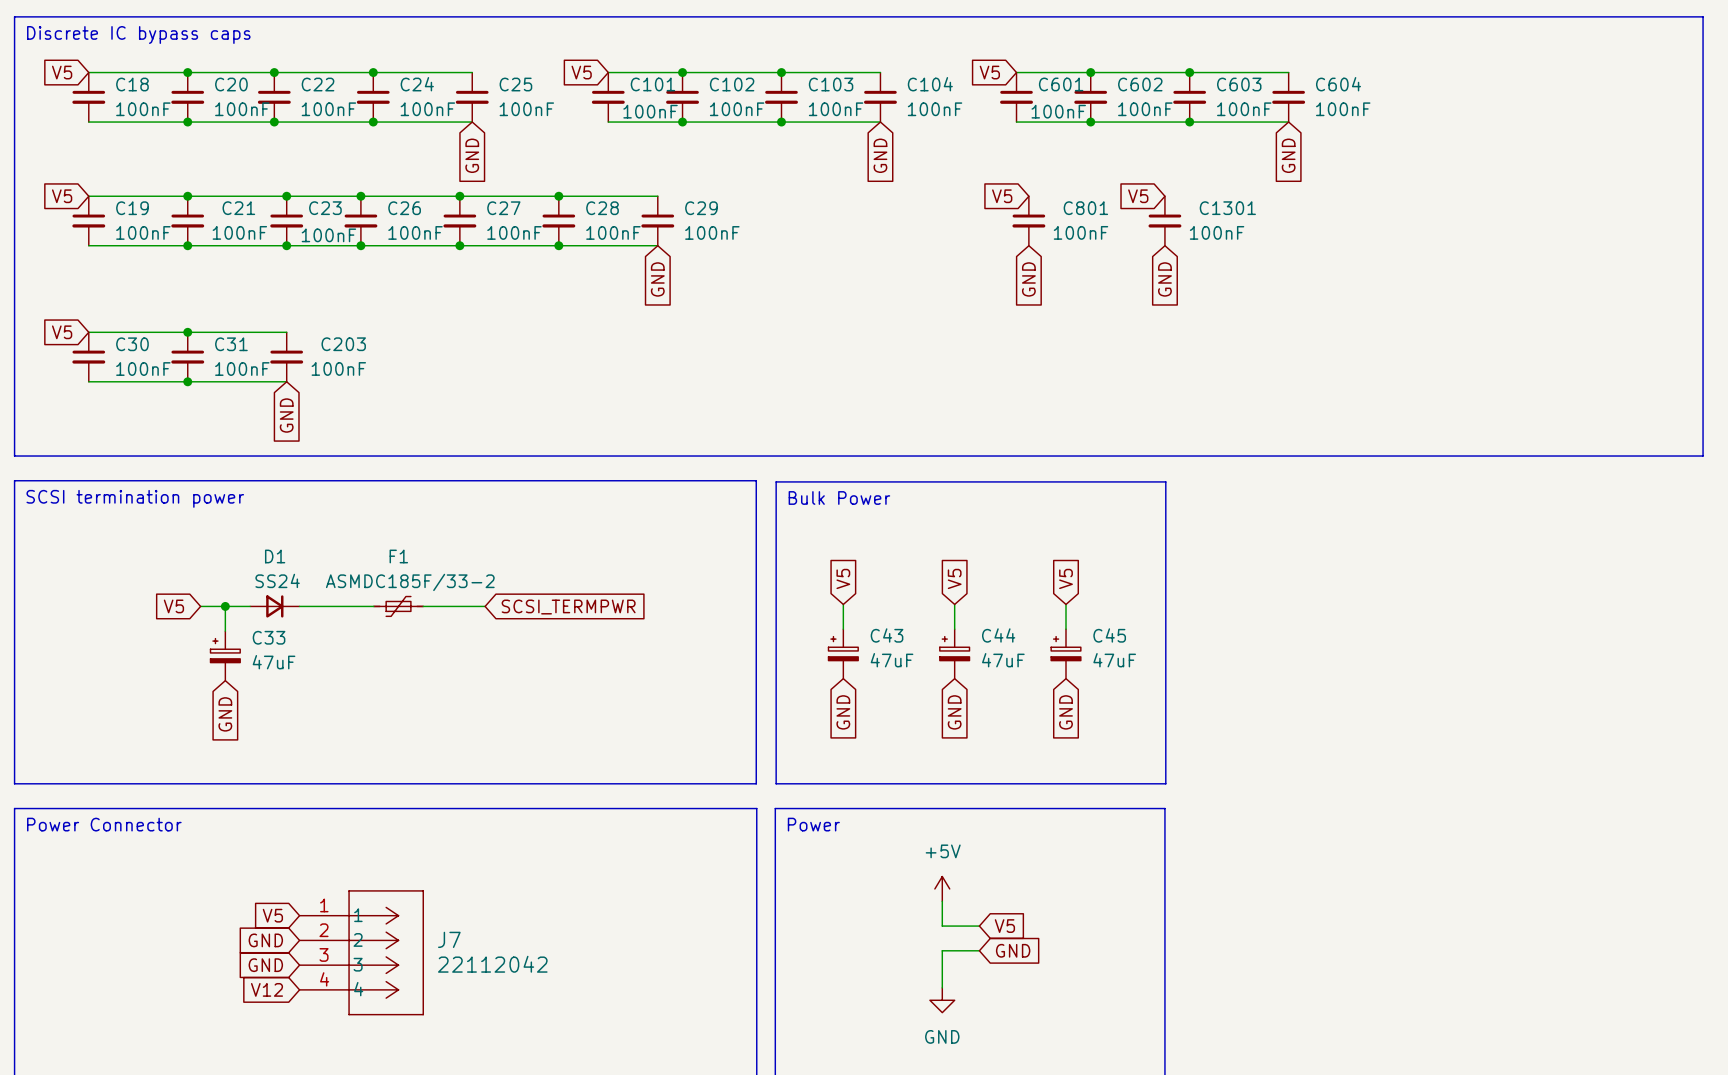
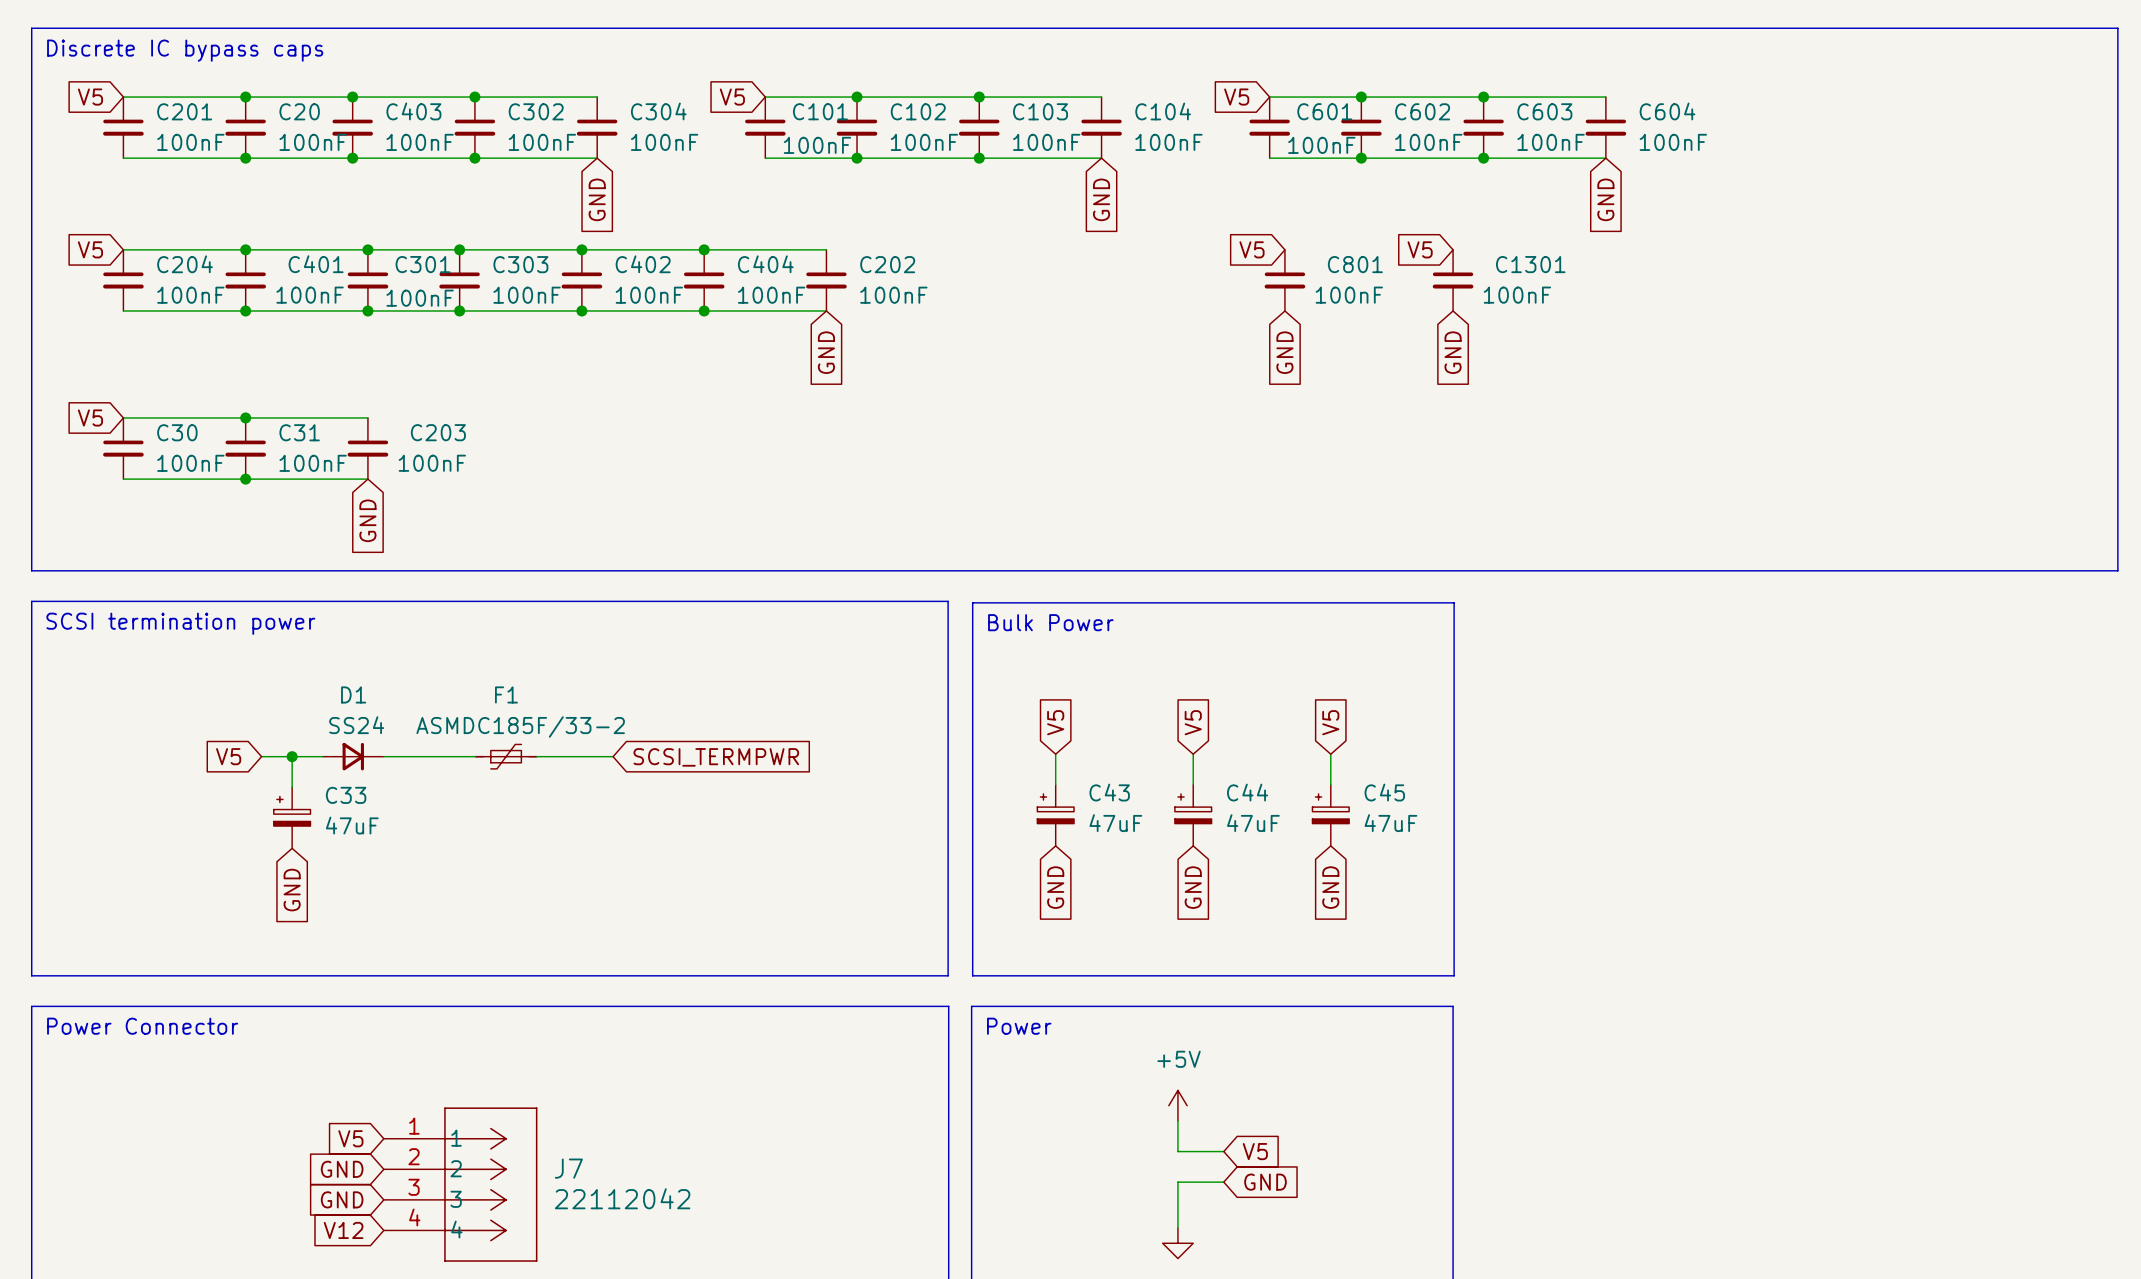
C18 name: C18 (132, 84) -> C201 (184, 111)
C22 name: C22 (318, 84) -> C403 (413, 111)
C24 name: C24 (417, 84) -> C302 (536, 111)
C25 name: C25 (515, 84) -> C304 (658, 111)
C19 name: C19 (132, 208) -> C204 (185, 264)
C21 name: C21 (238, 208) -> C401 (316, 264)
C23 name: C23 (325, 208) -> C301 (423, 264)
C26 name: C26 (404, 208) -> C303 (520, 264)
C27 name: C27 (503, 208) -> C402 (643, 264)
C28 name: C28 (602, 208) -> C404 (765, 264)
C29 name: C29 (701, 208) -> C202 (887, 264)

